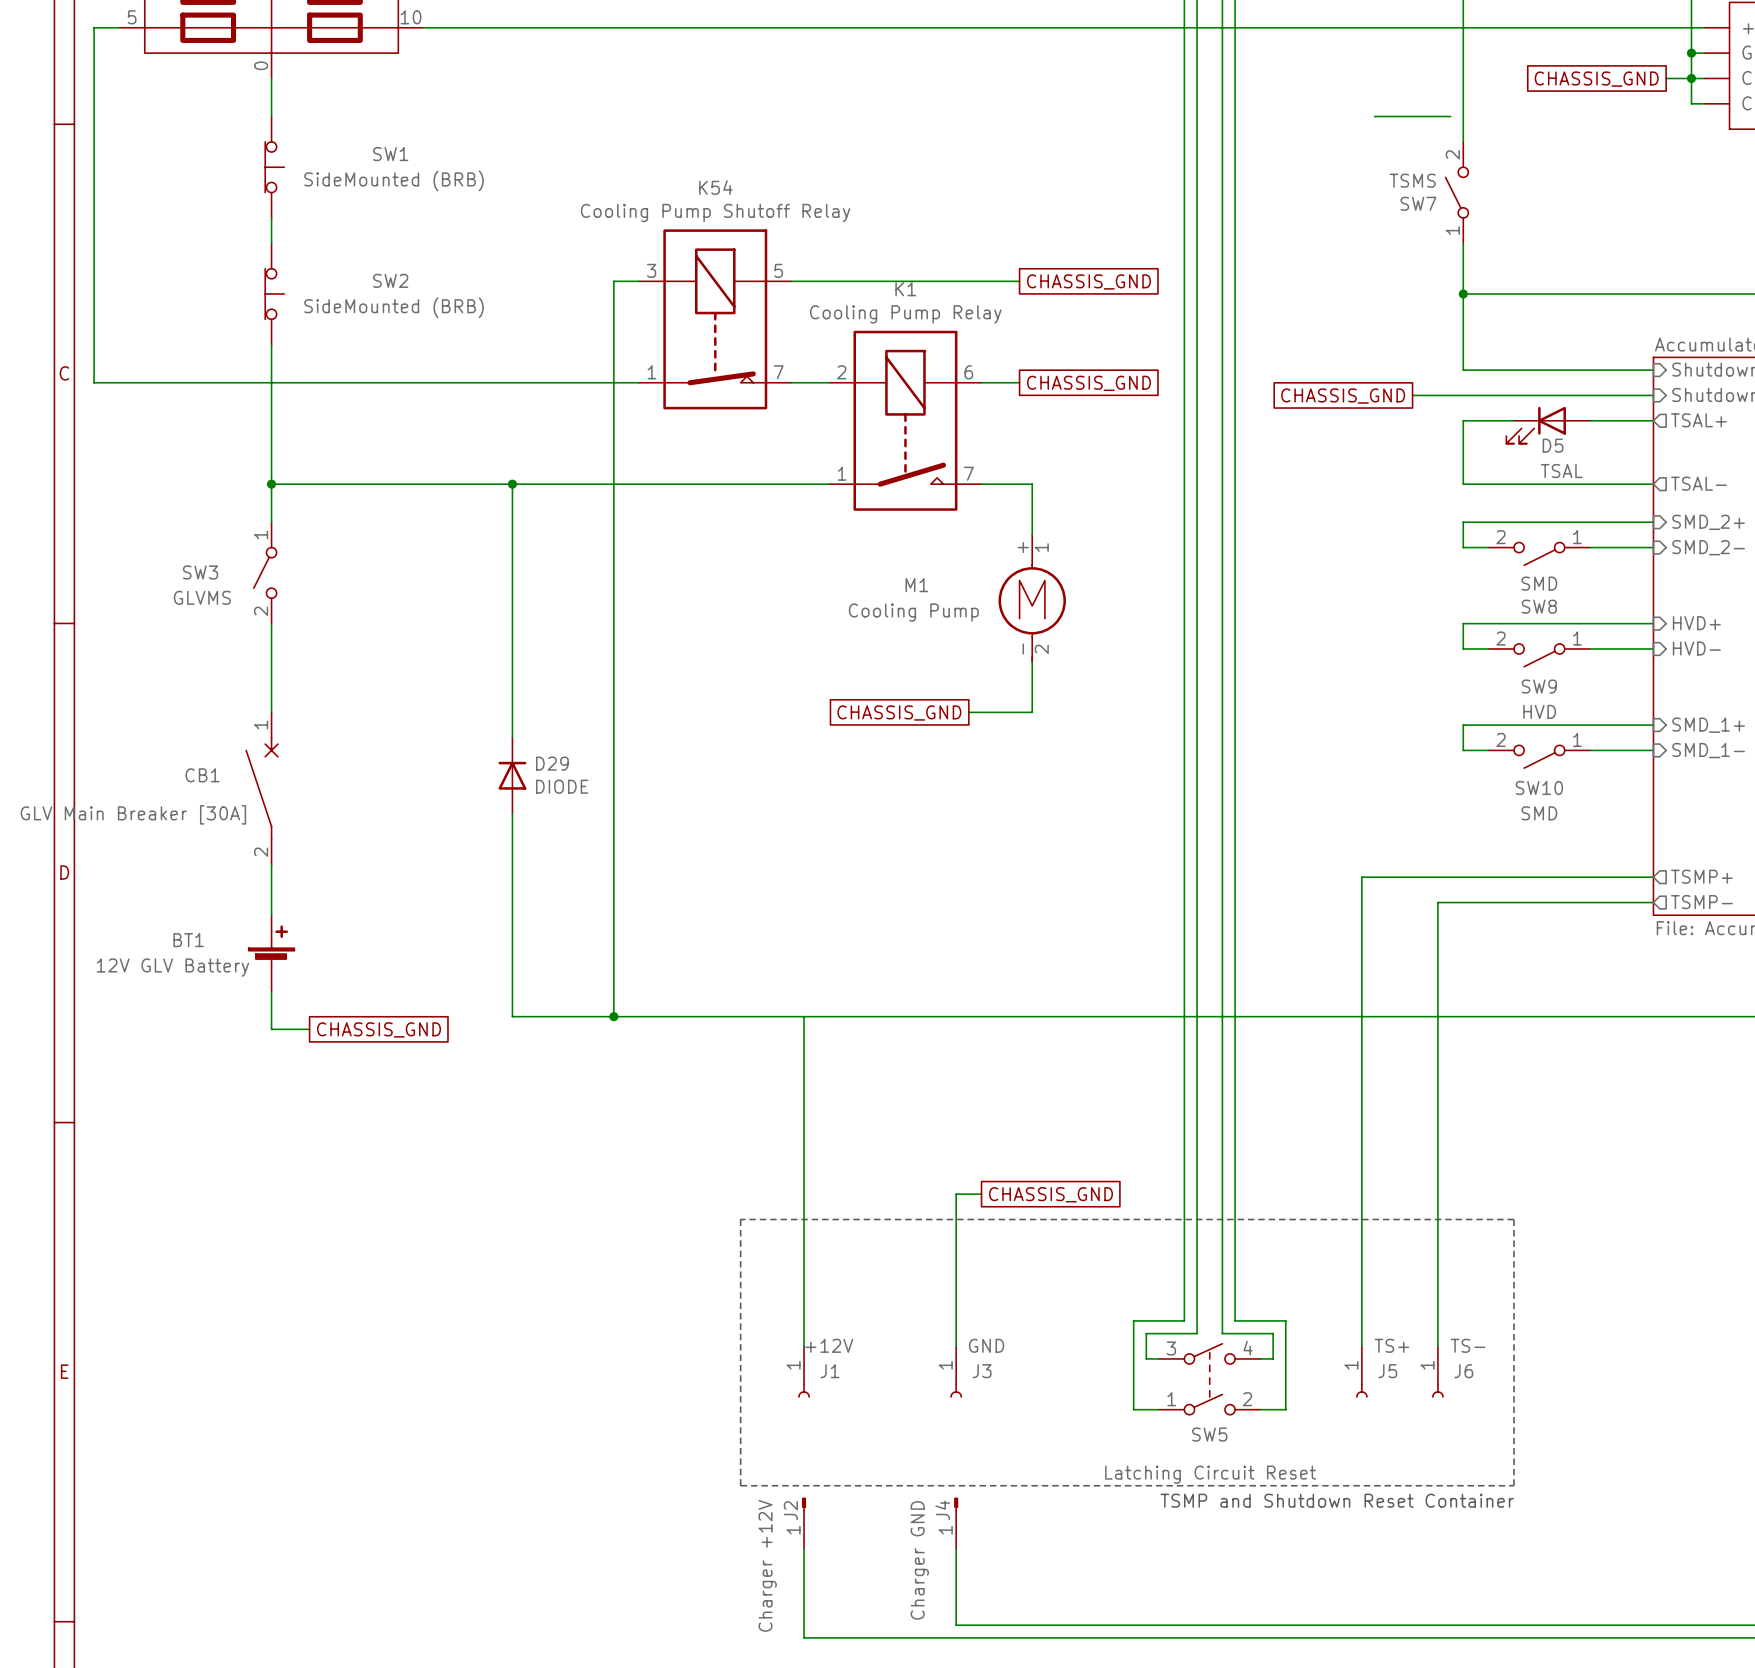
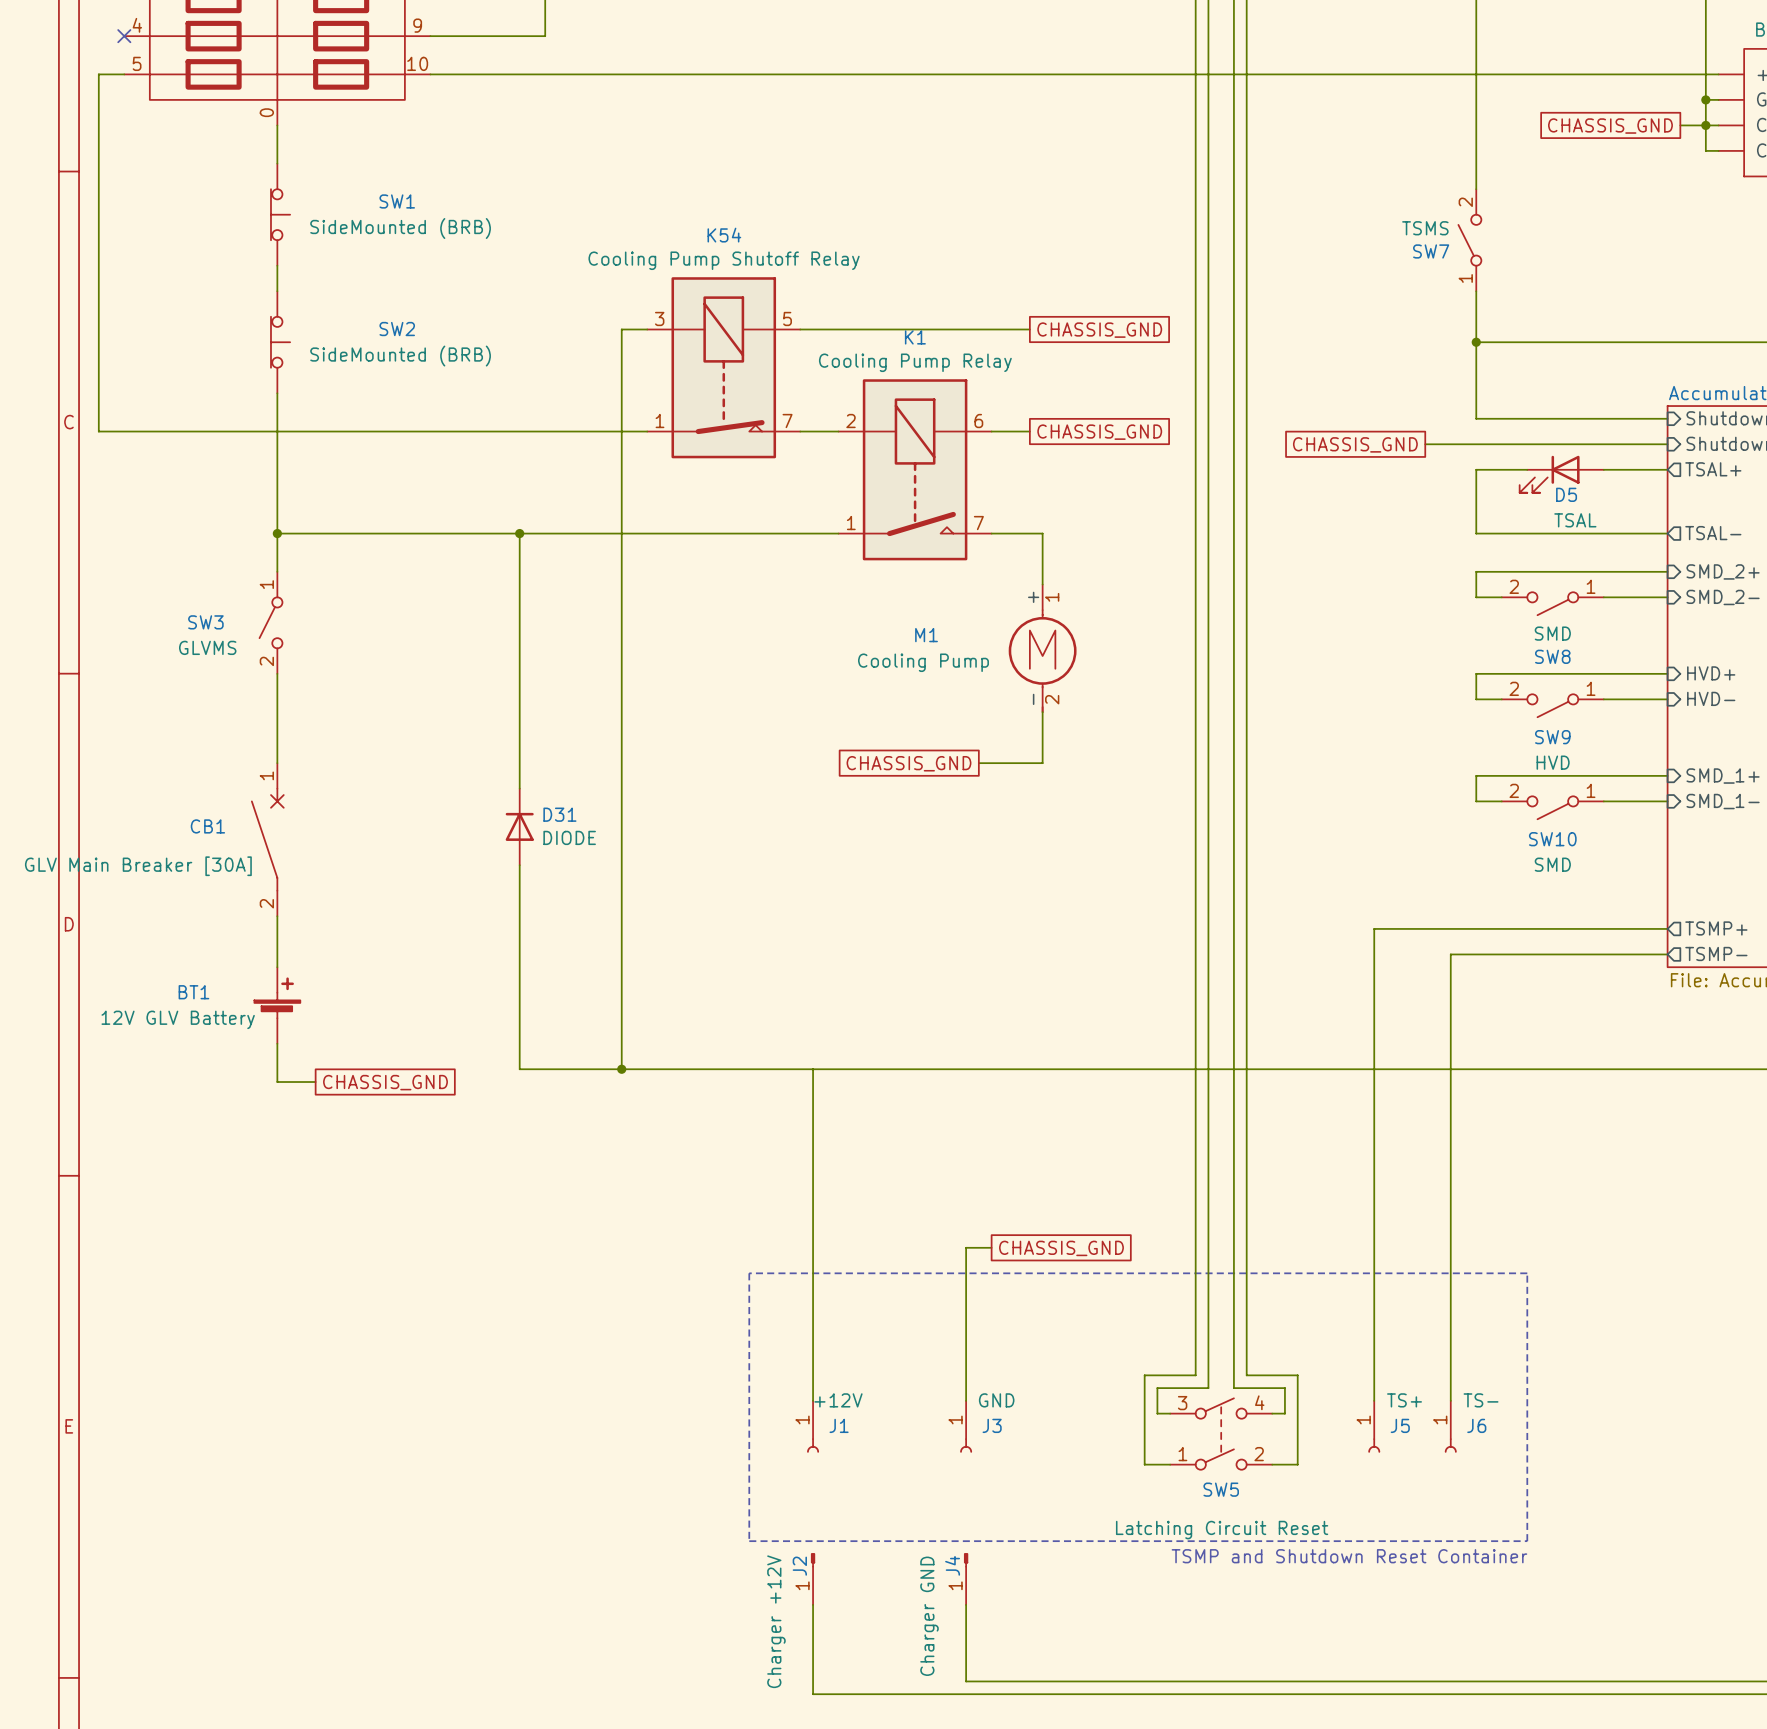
wire: (1374, 116) (1450, 116) -> none
D29 name: D29 (552, 763) -> D31 (559, 814)

